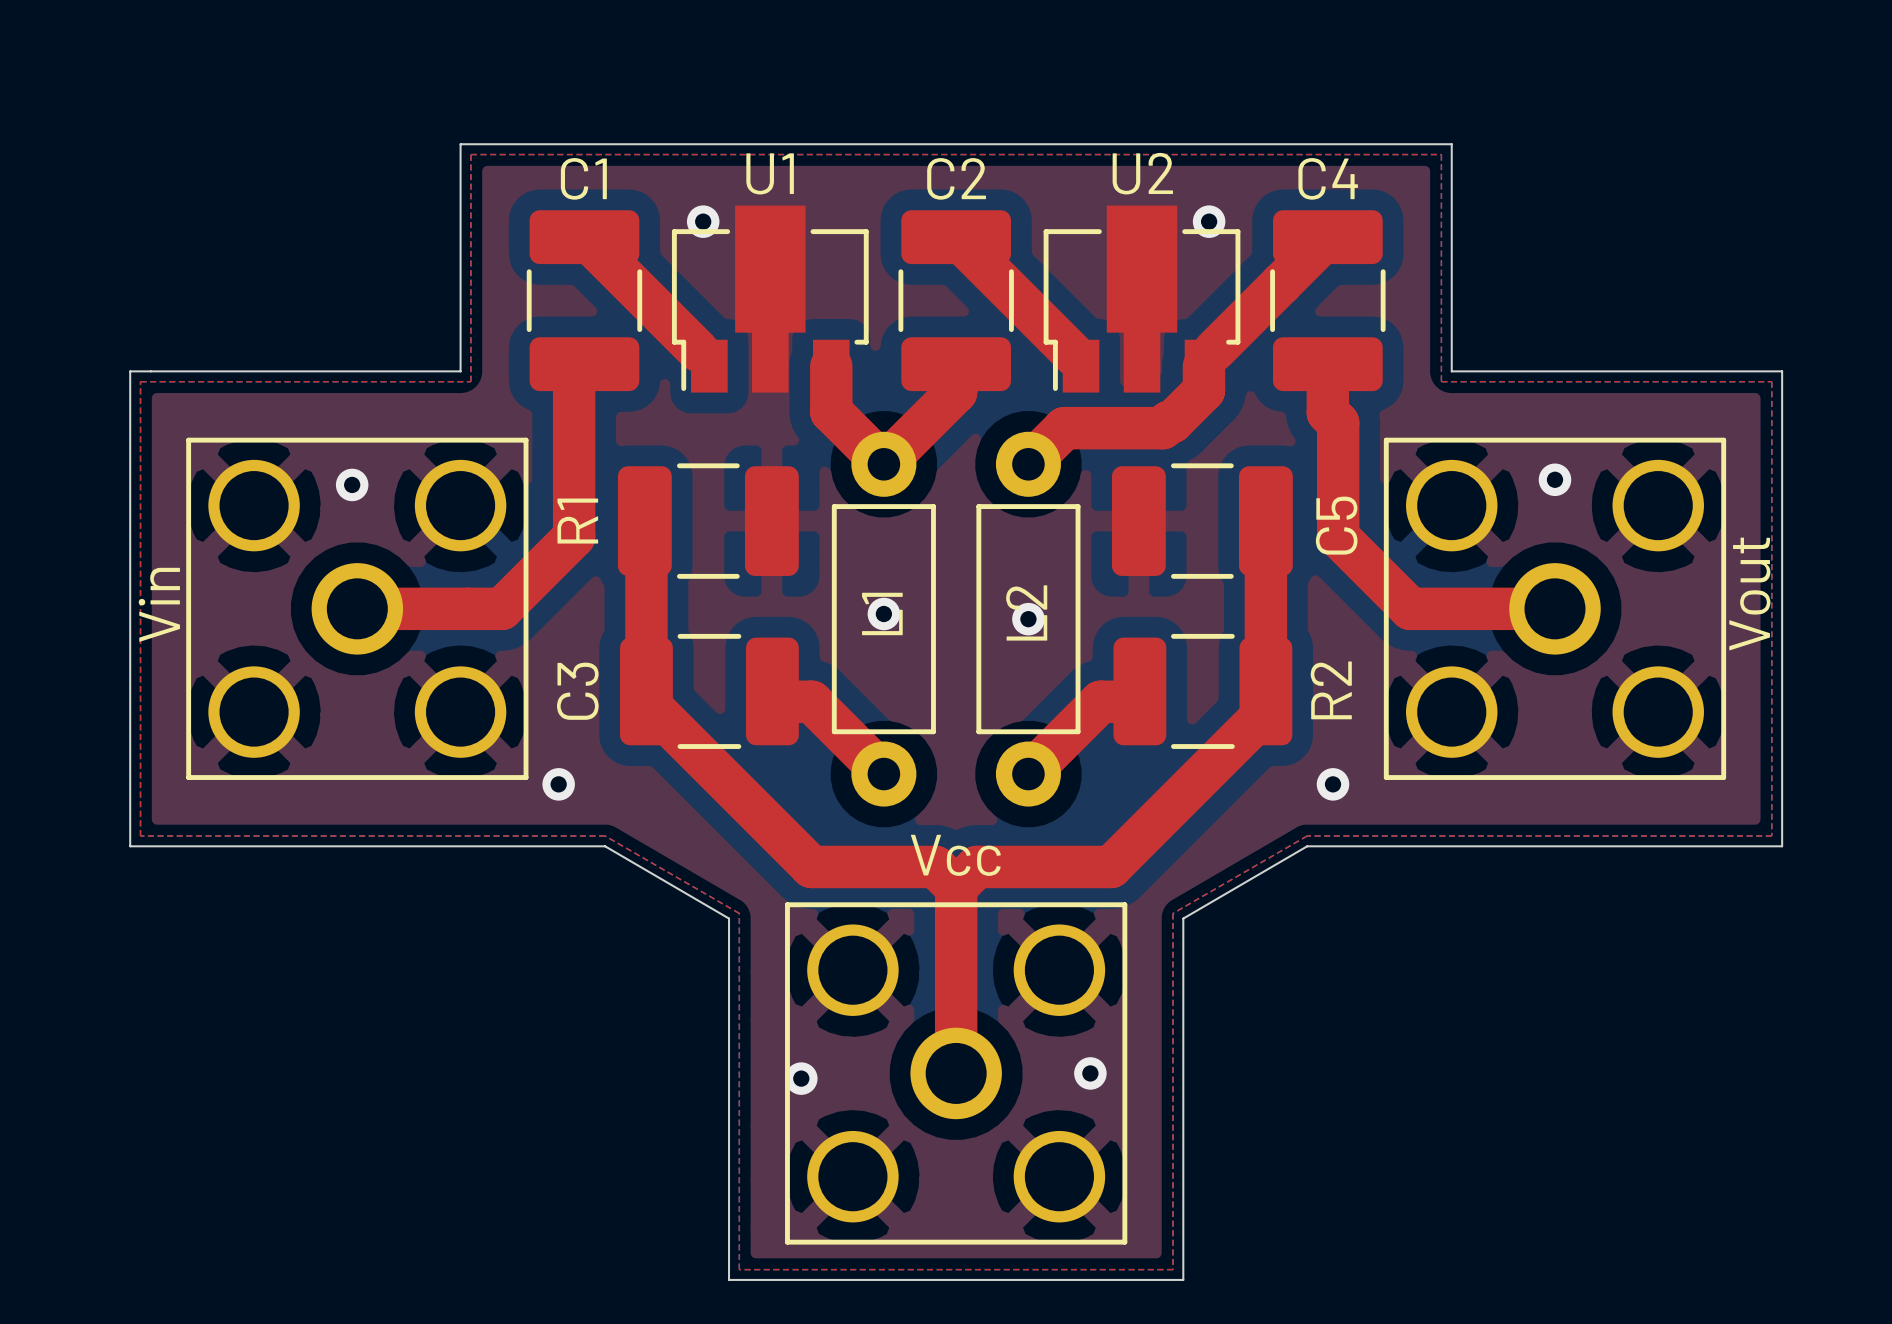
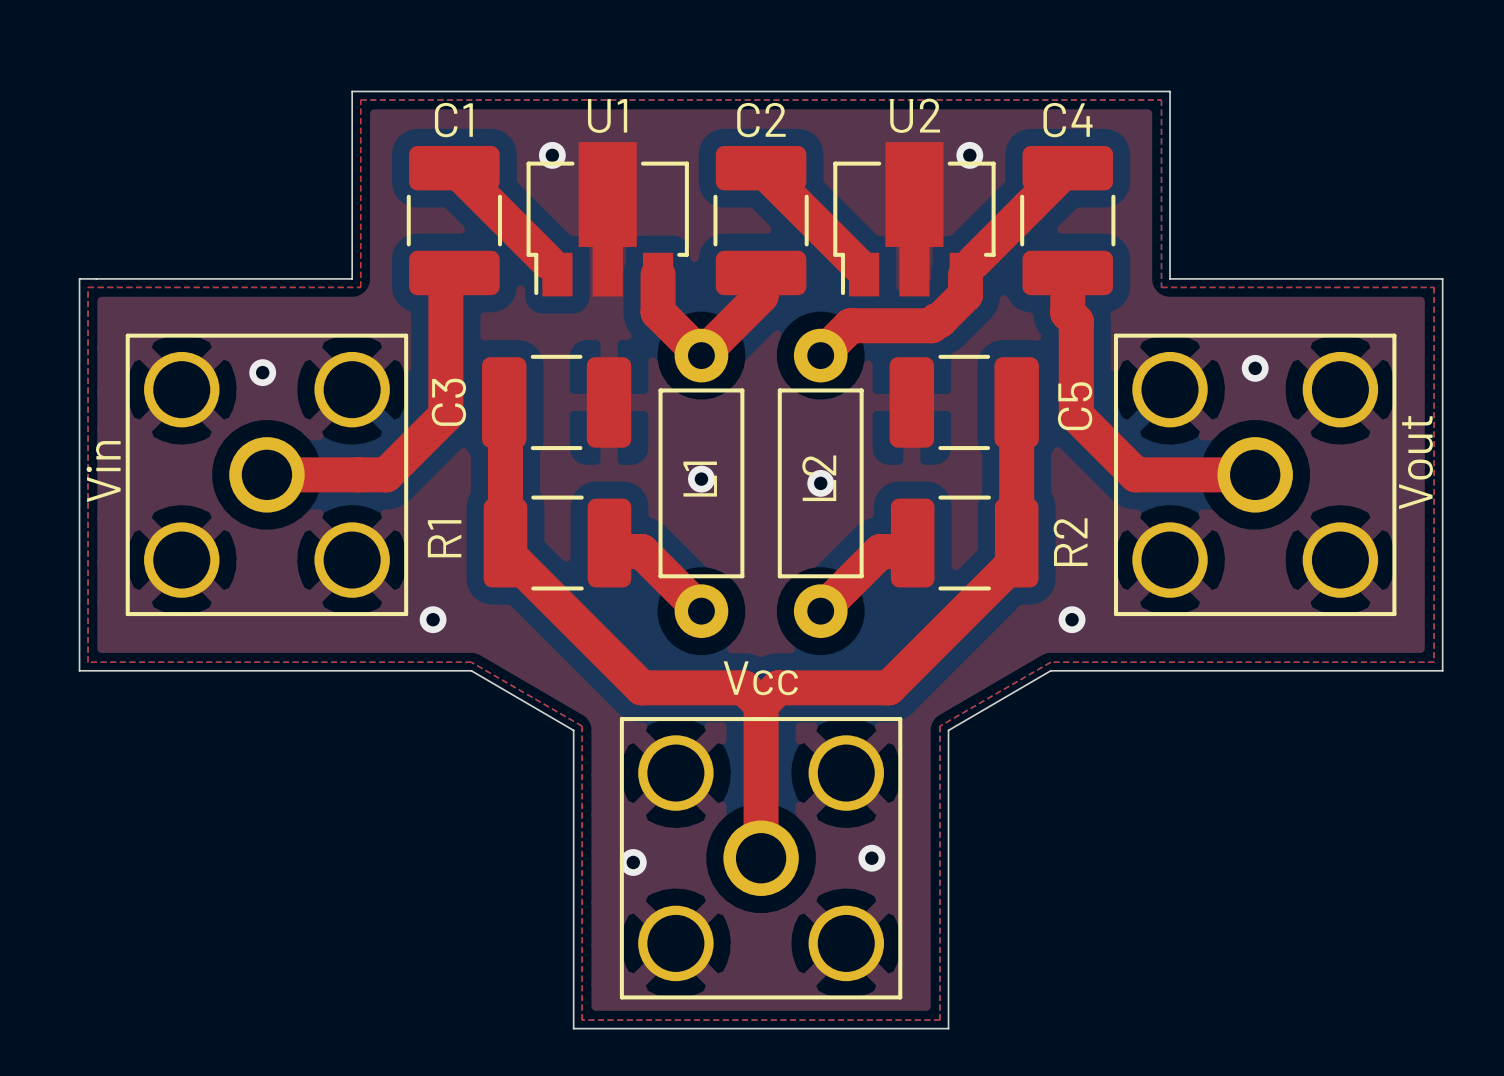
R1 name position: R1 (577, 521) -> R1 (444, 538)
C3 name position: C3 (577, 691) -> C3 (448, 402)

